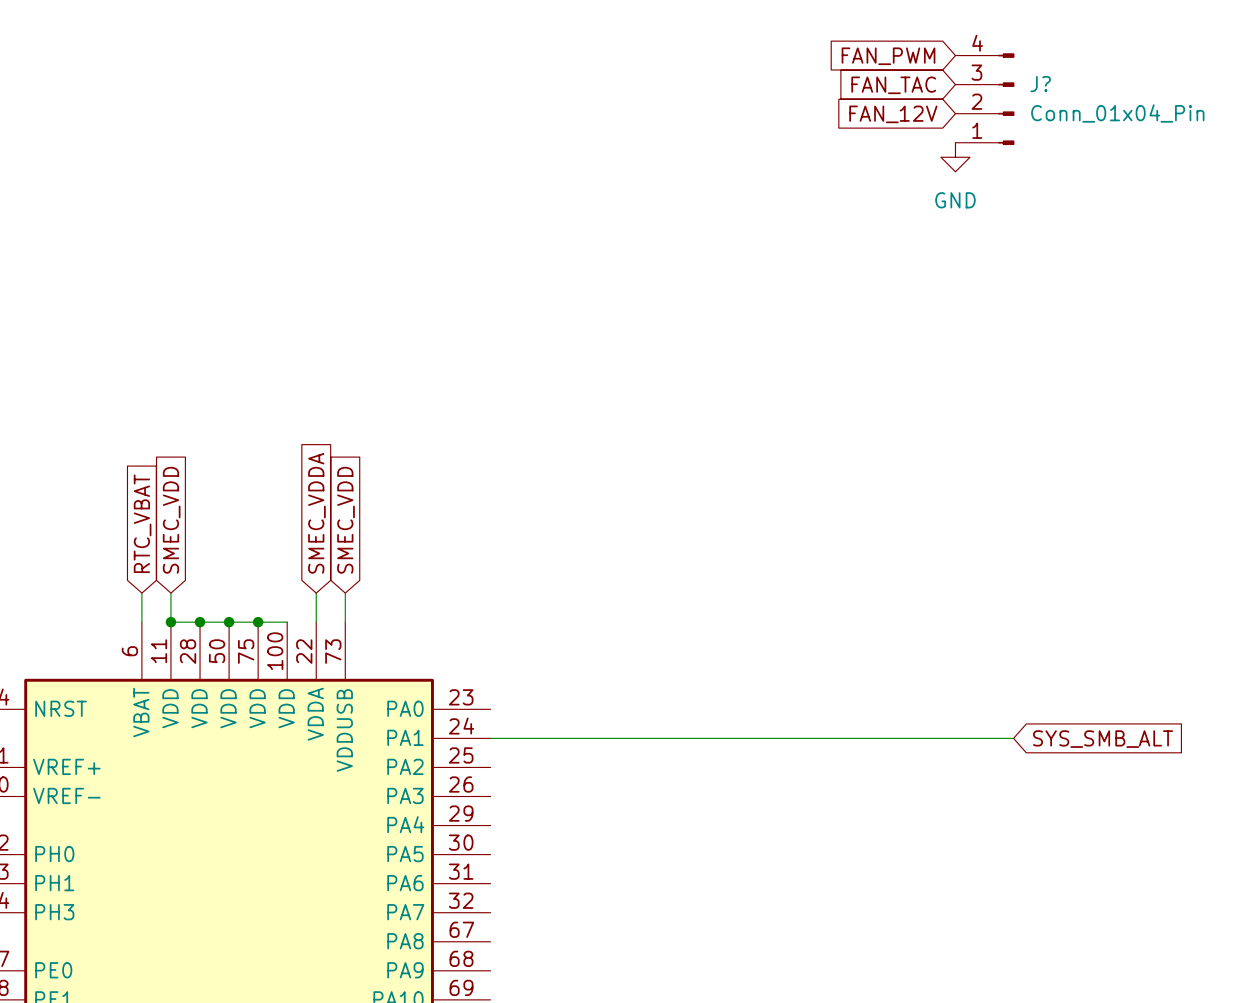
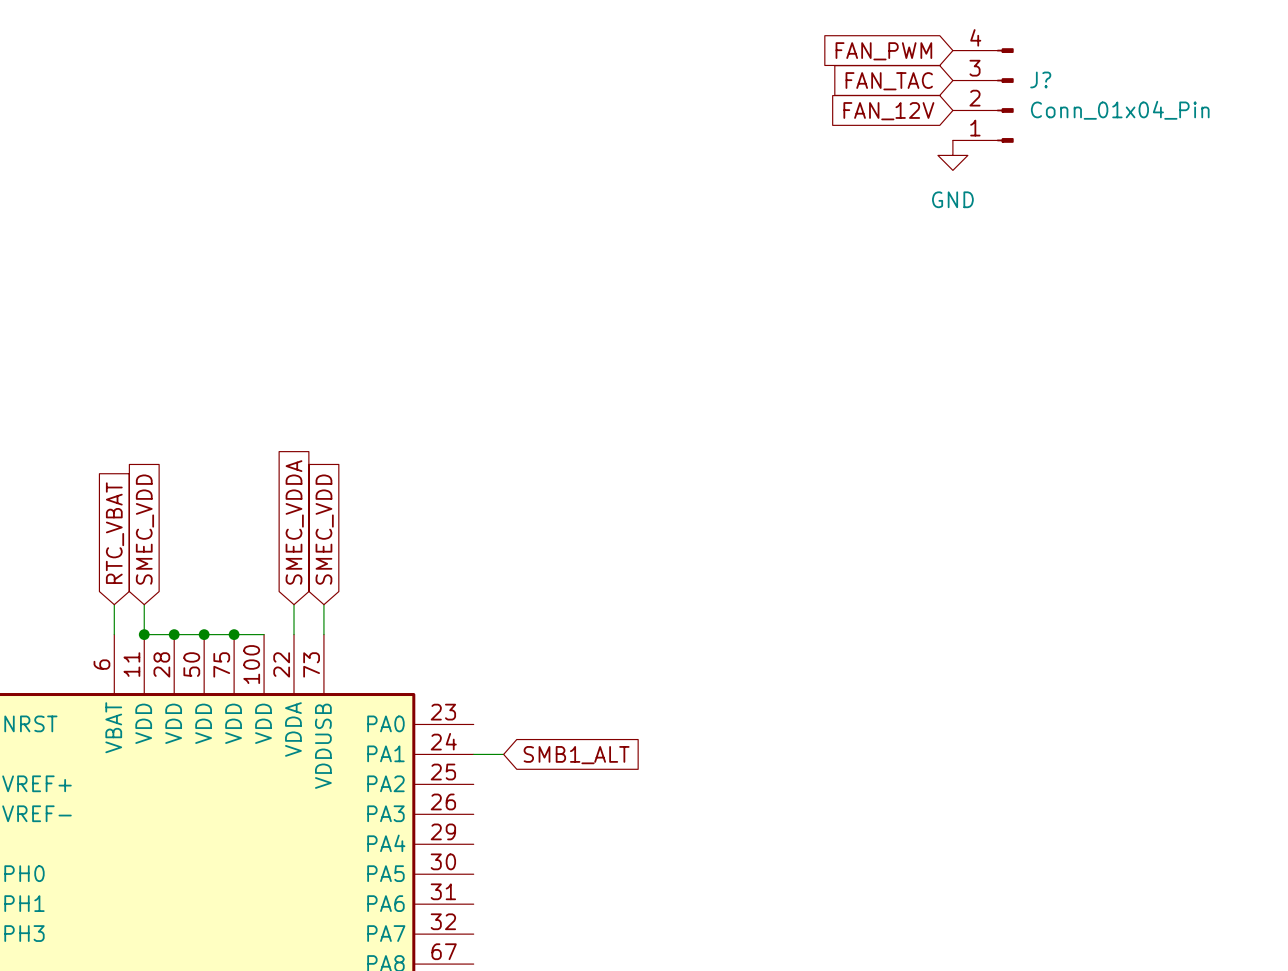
wire: (519, 738) (1013, 738) -> none
global label: none -> SMB1_ALT (576, 755)
global label: SYS_SMB_ALT (1103, 739) -> none

